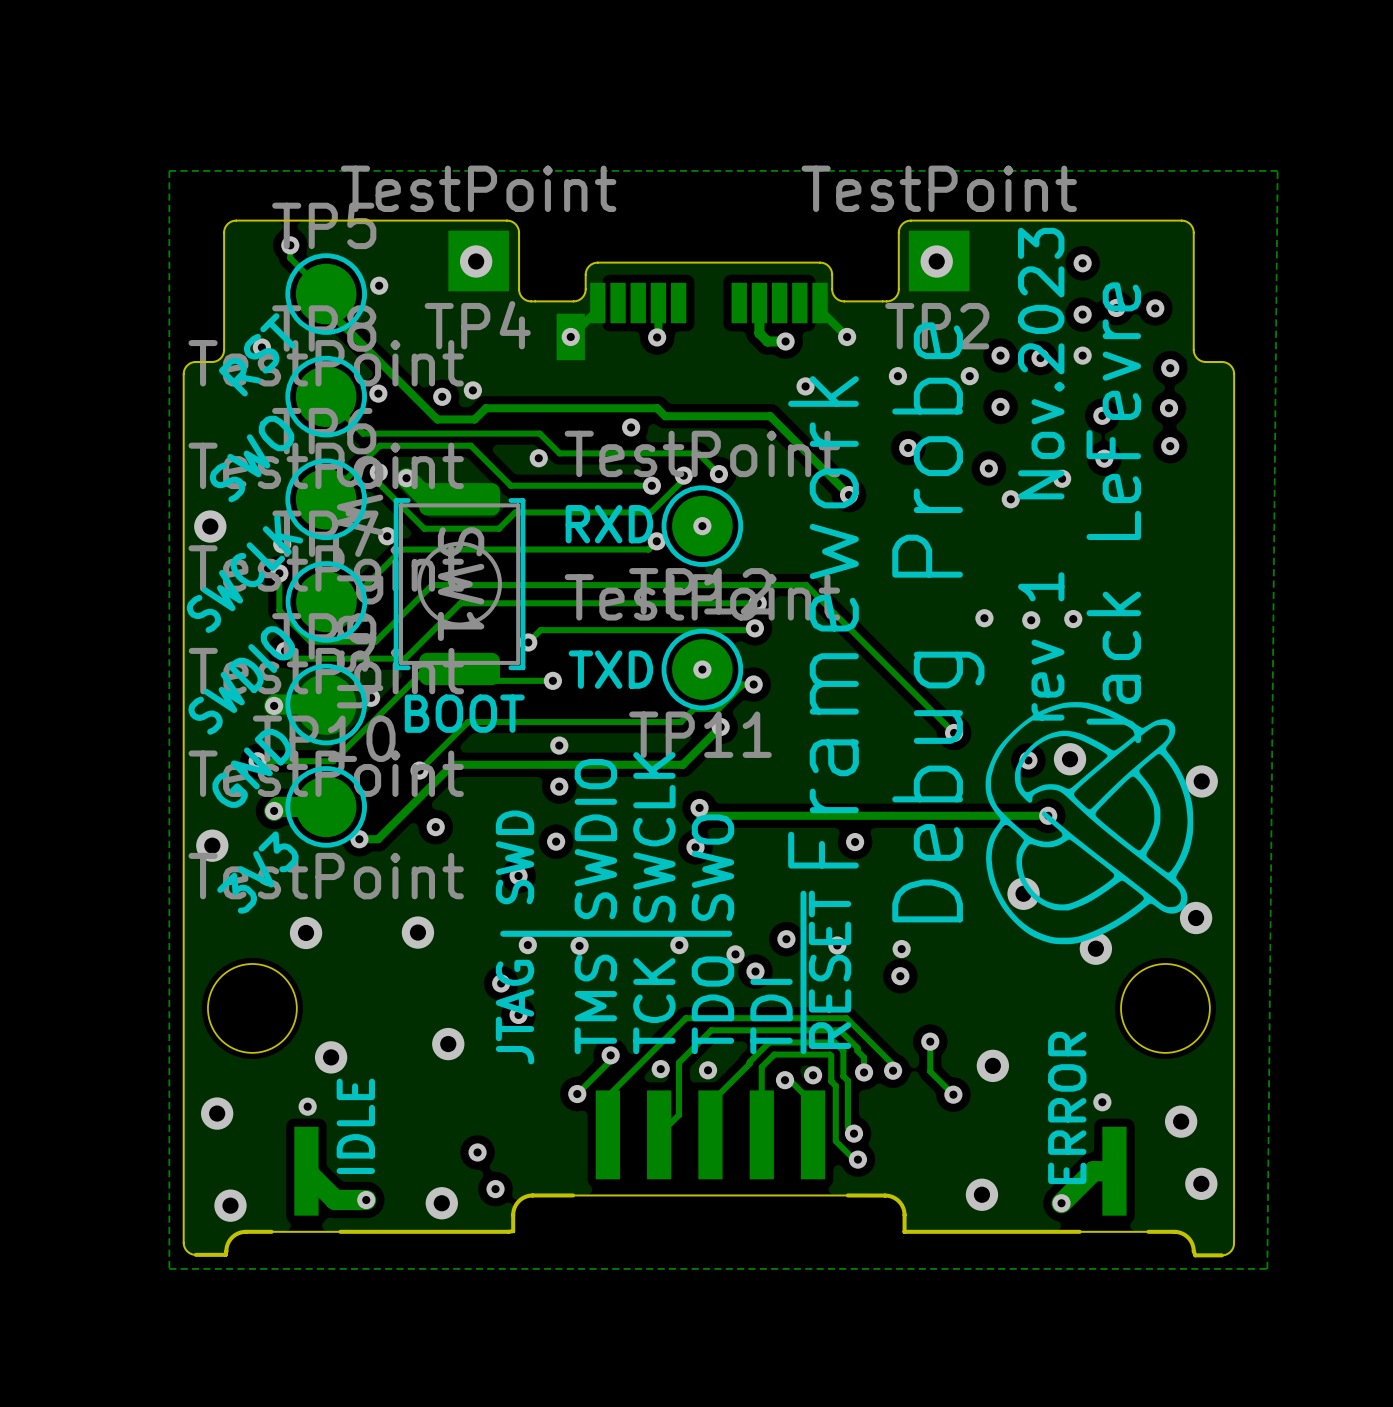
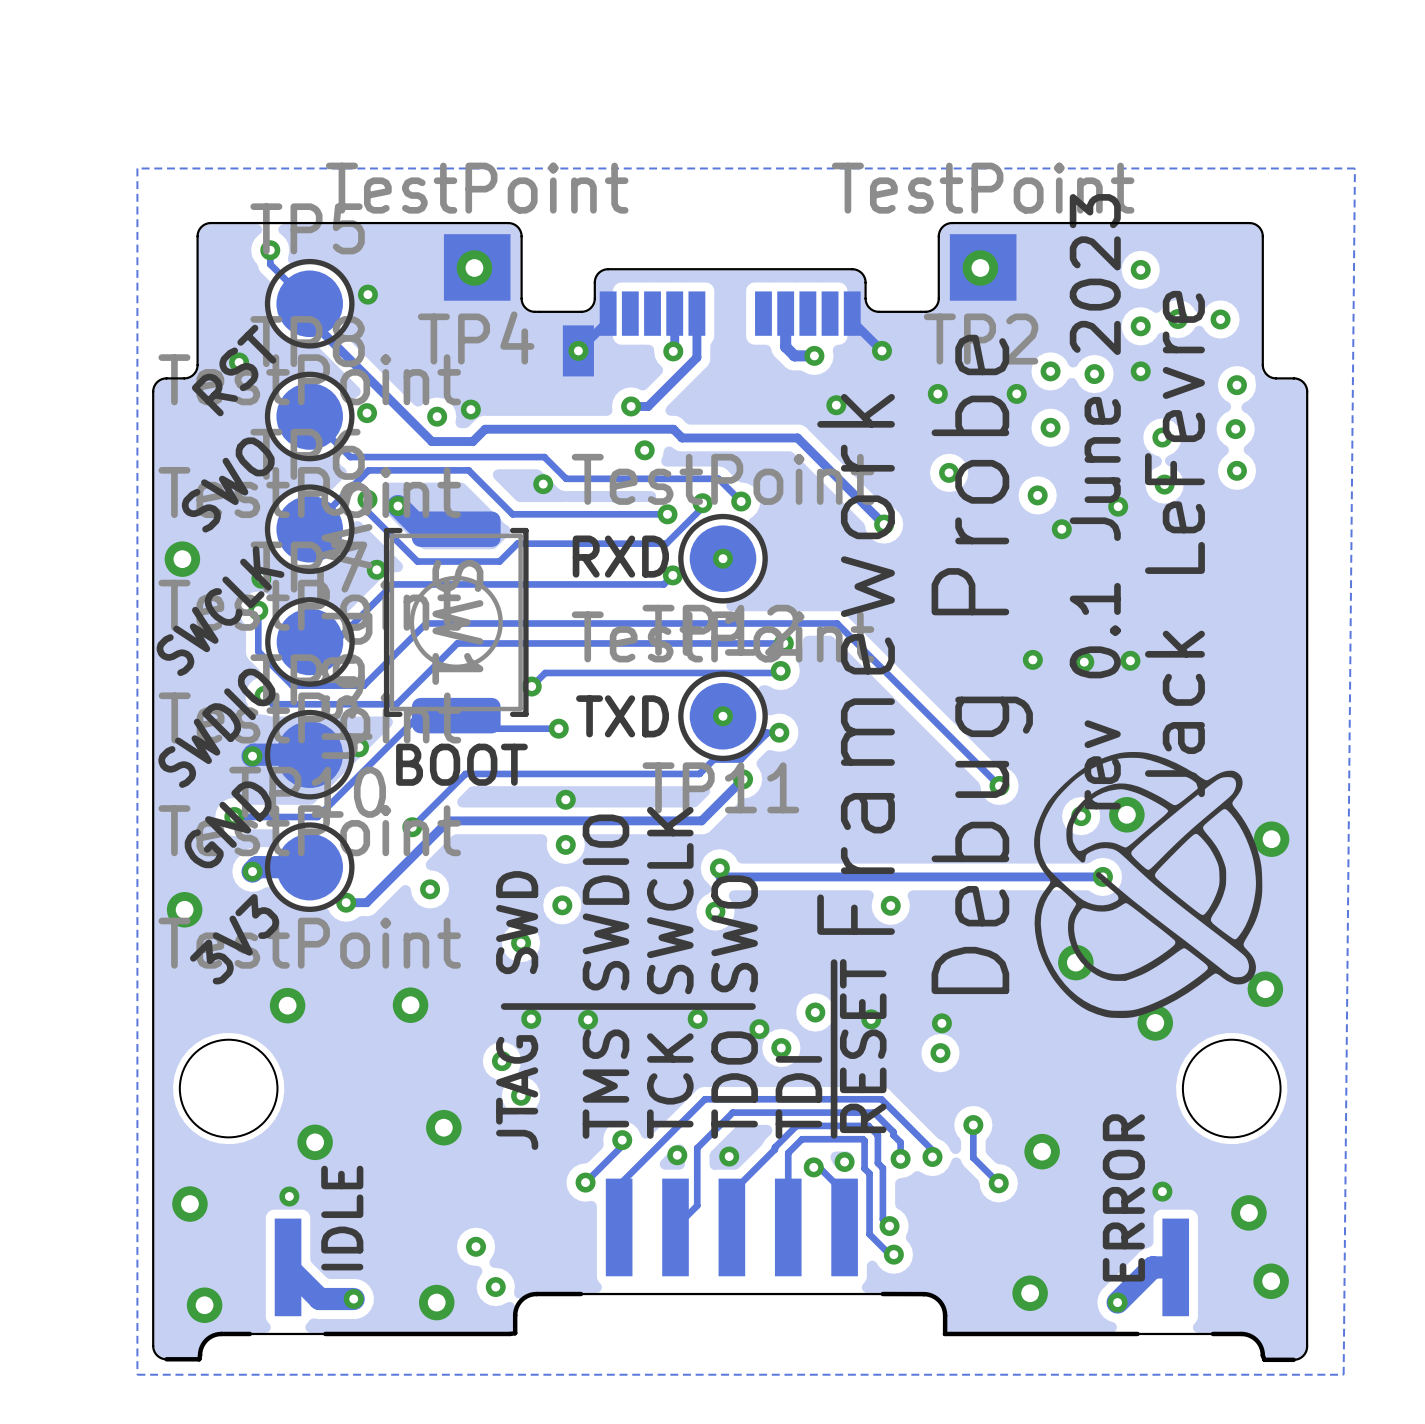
track: none -> (696, 313) (696, 357) (648, 406) (631, 406)
via: none -> (631, 406)
text: rev 1 Nov.2023 (1041, 474) -> rev 0.1 June 2023 (1095, 501)

